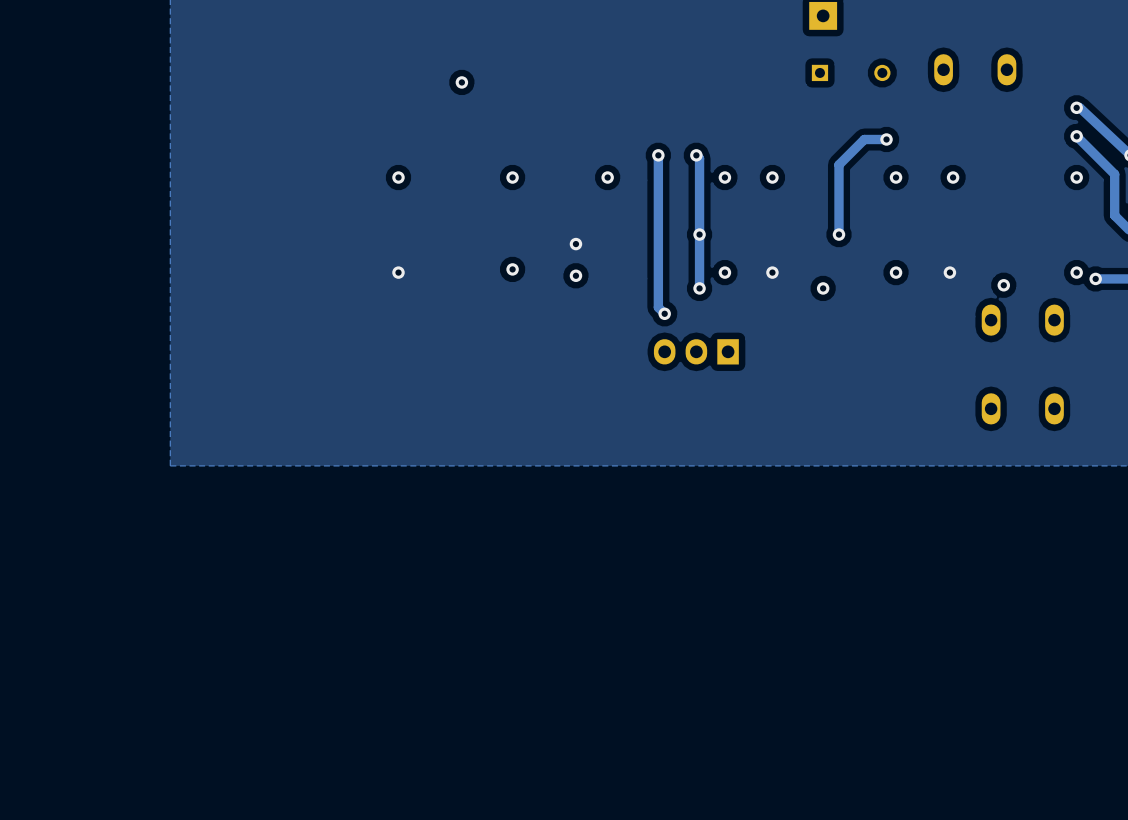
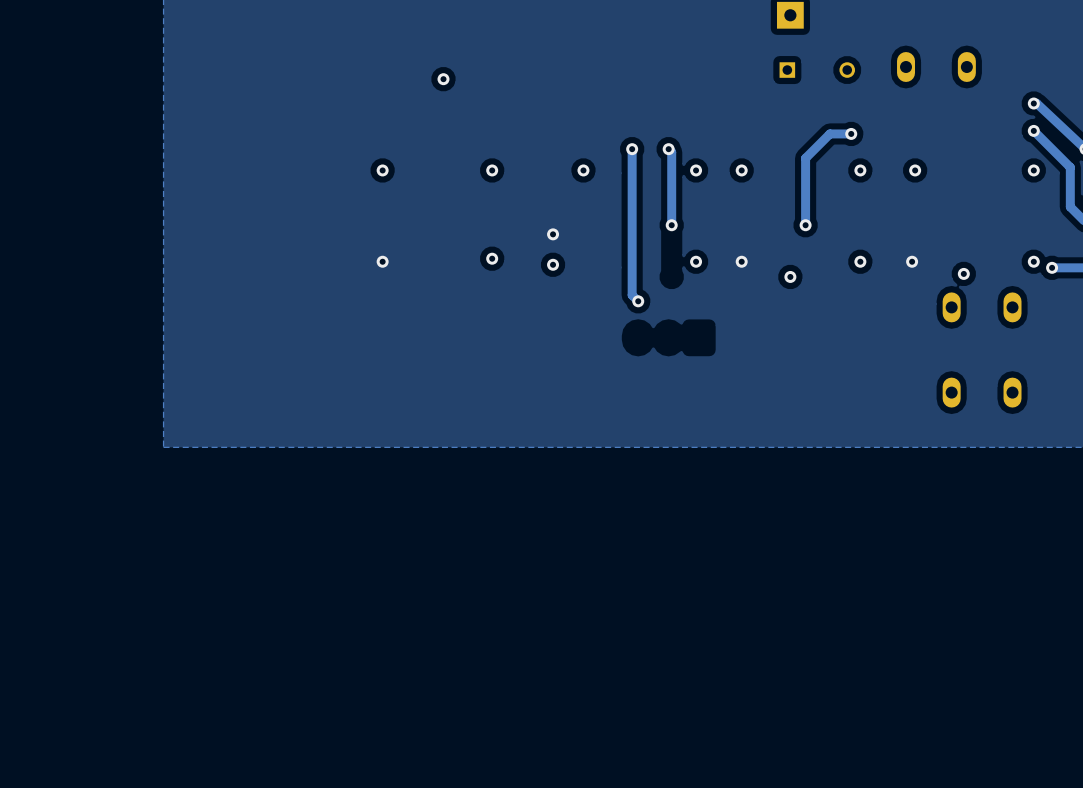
track: (699, 234) (699, 288) -> none
via: (699, 288) -> none
part: (696, 351) -> none

